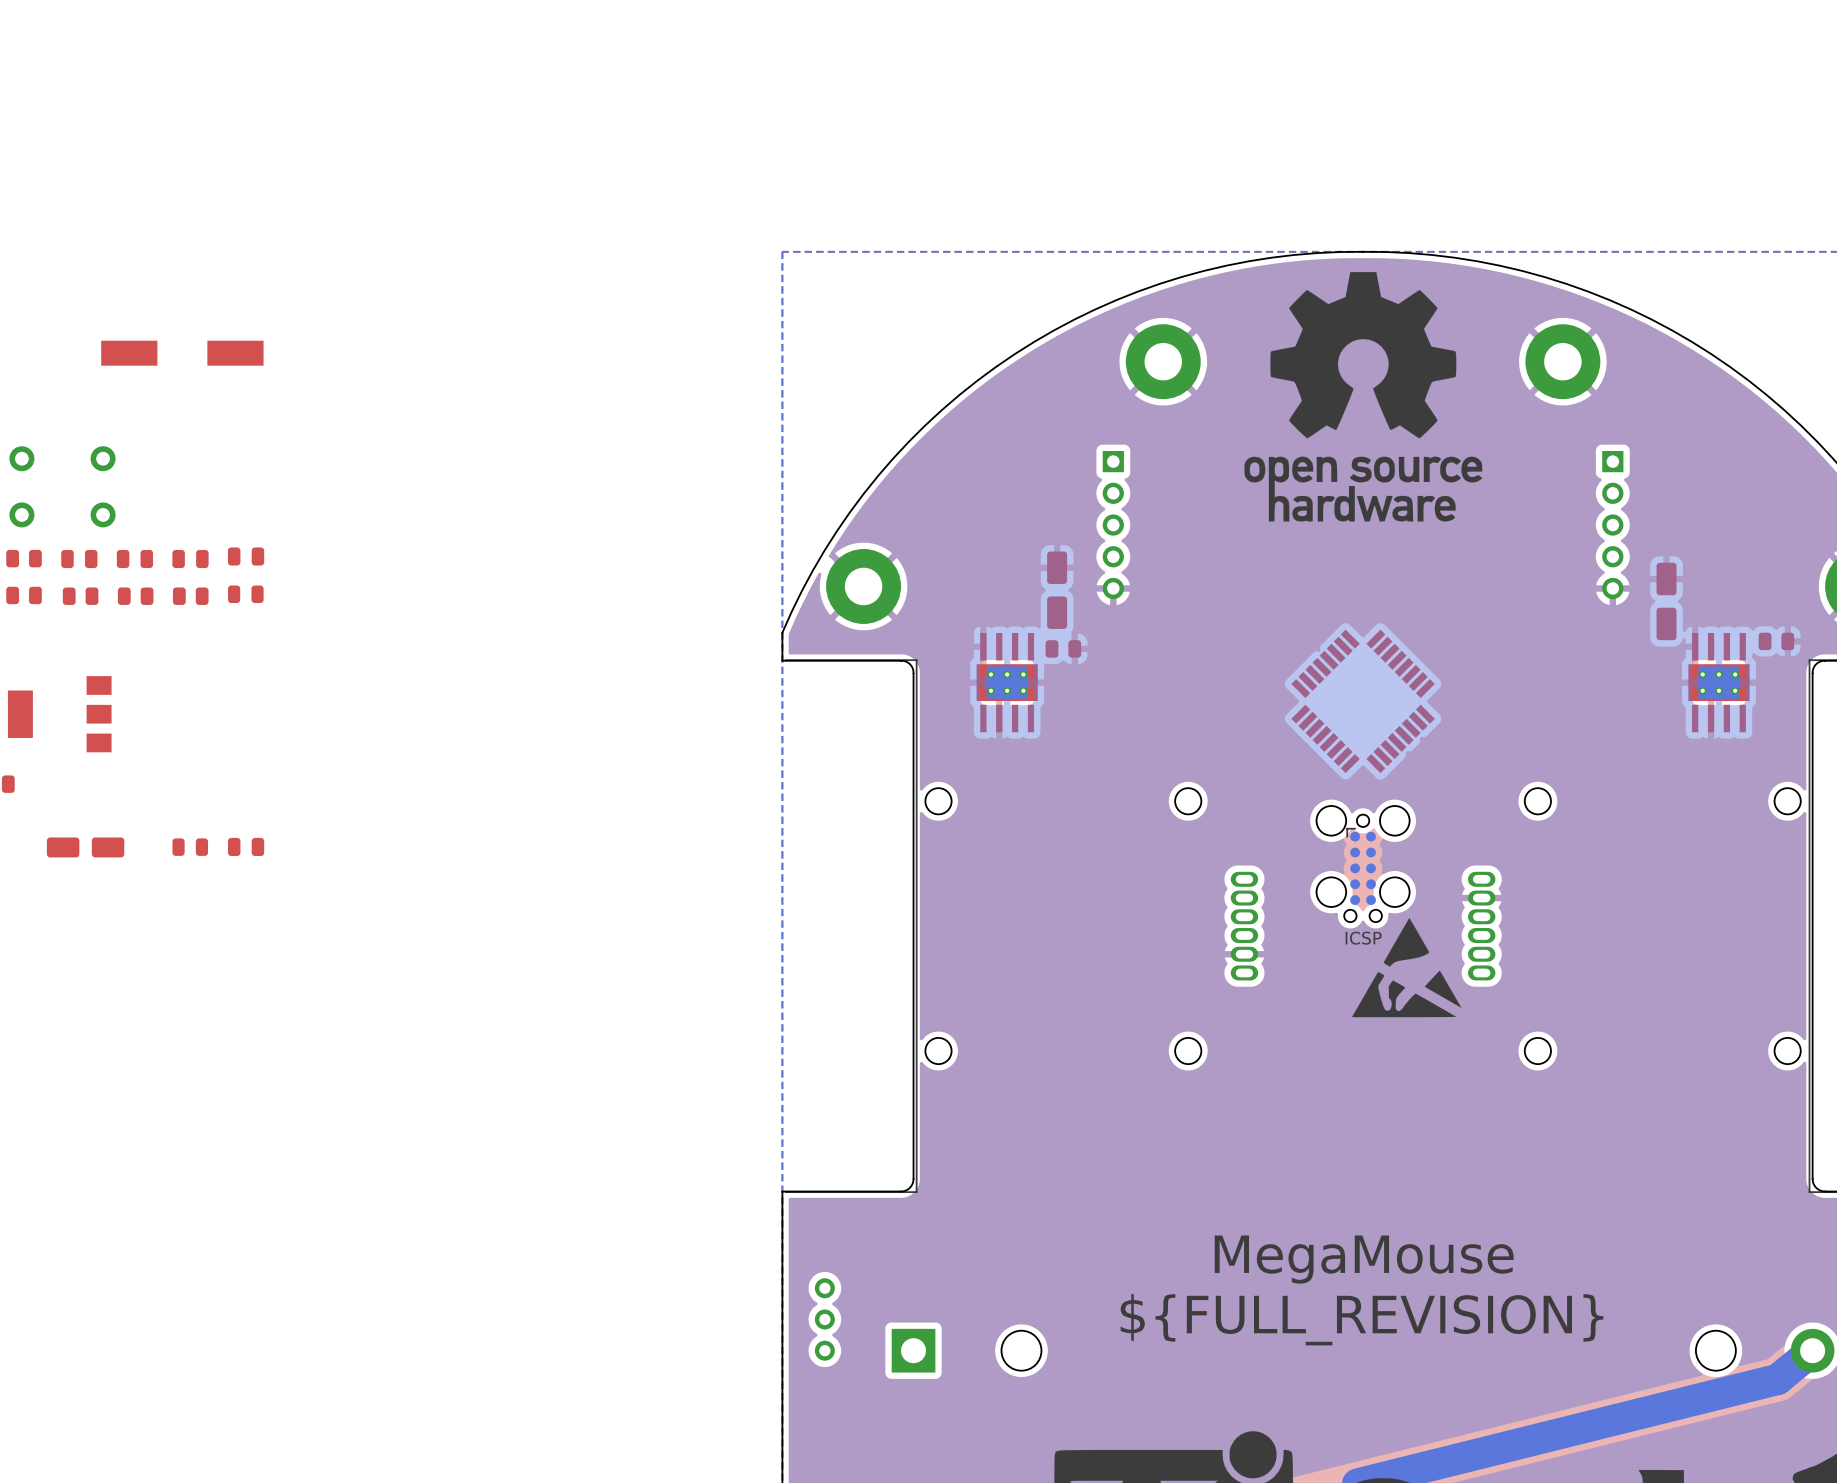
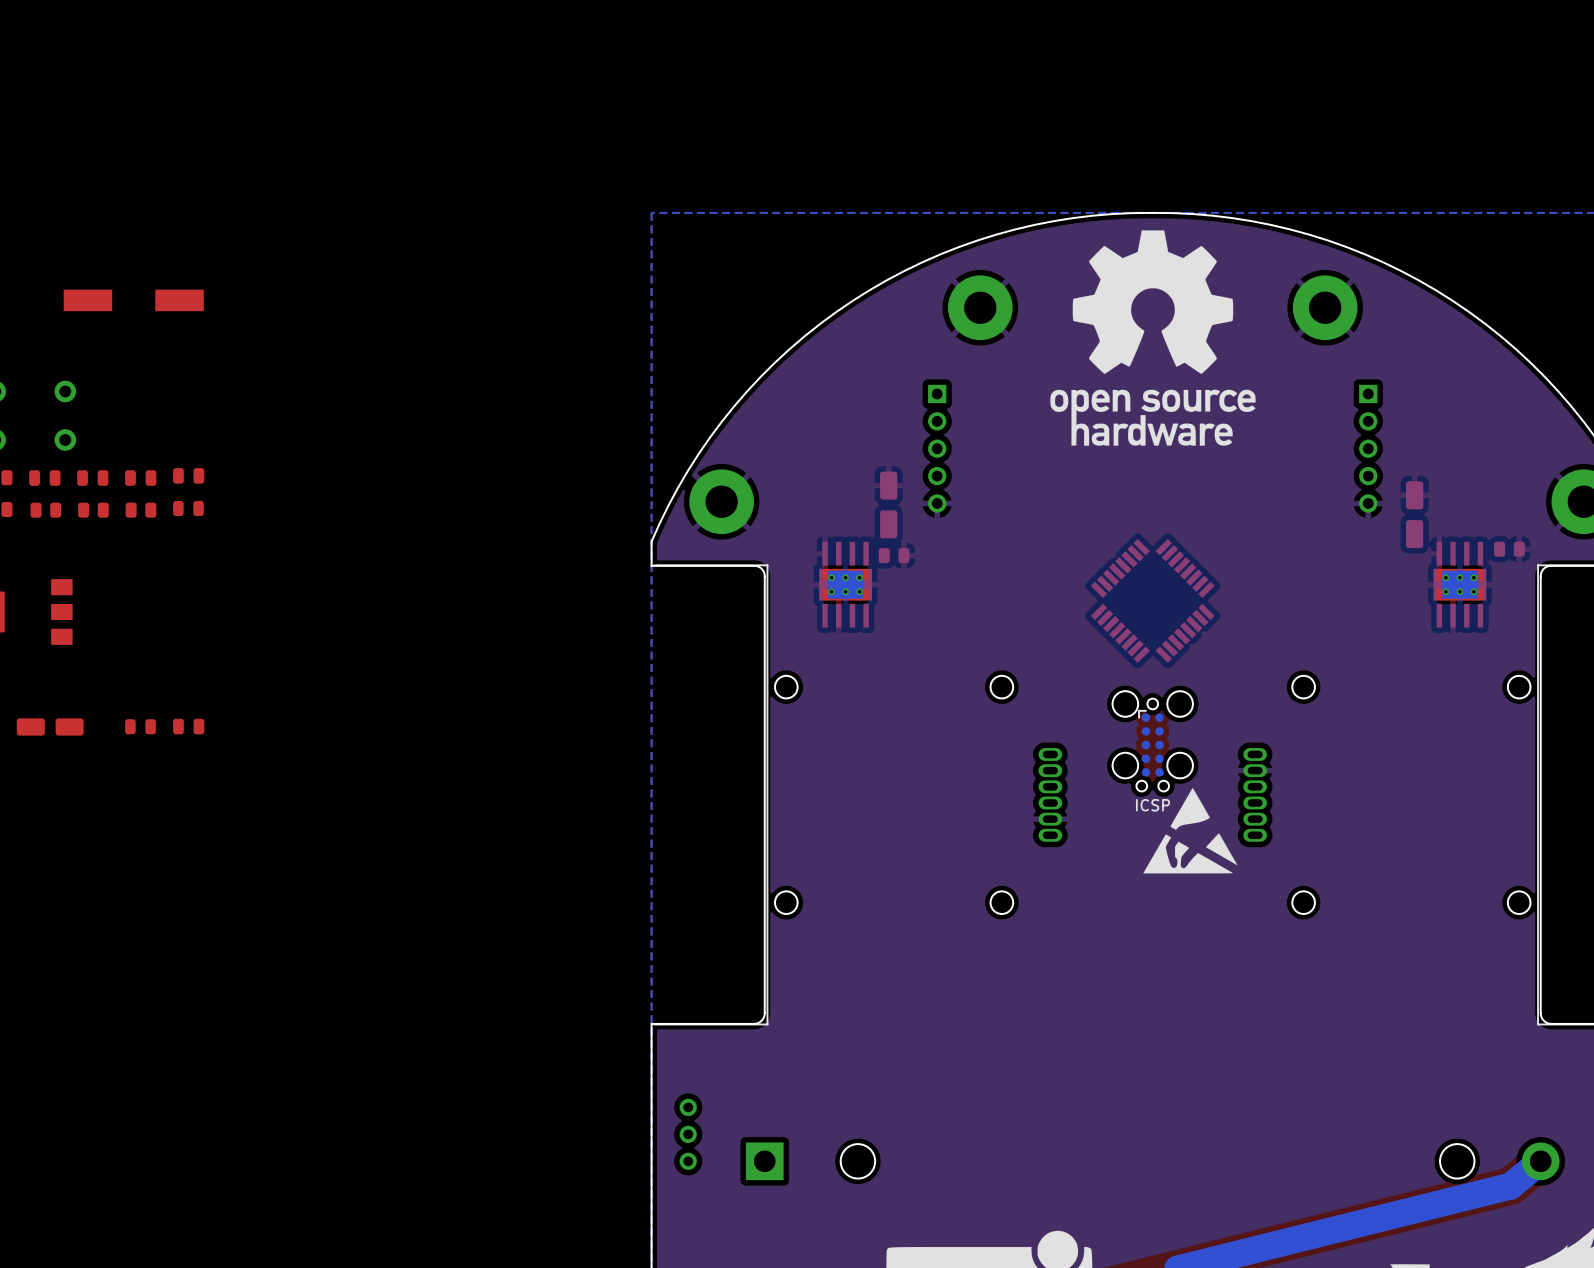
text: MegaMouse (1364, 1259) -> none
text: ${FULL_REVISION} (1361, 1319) -> none

